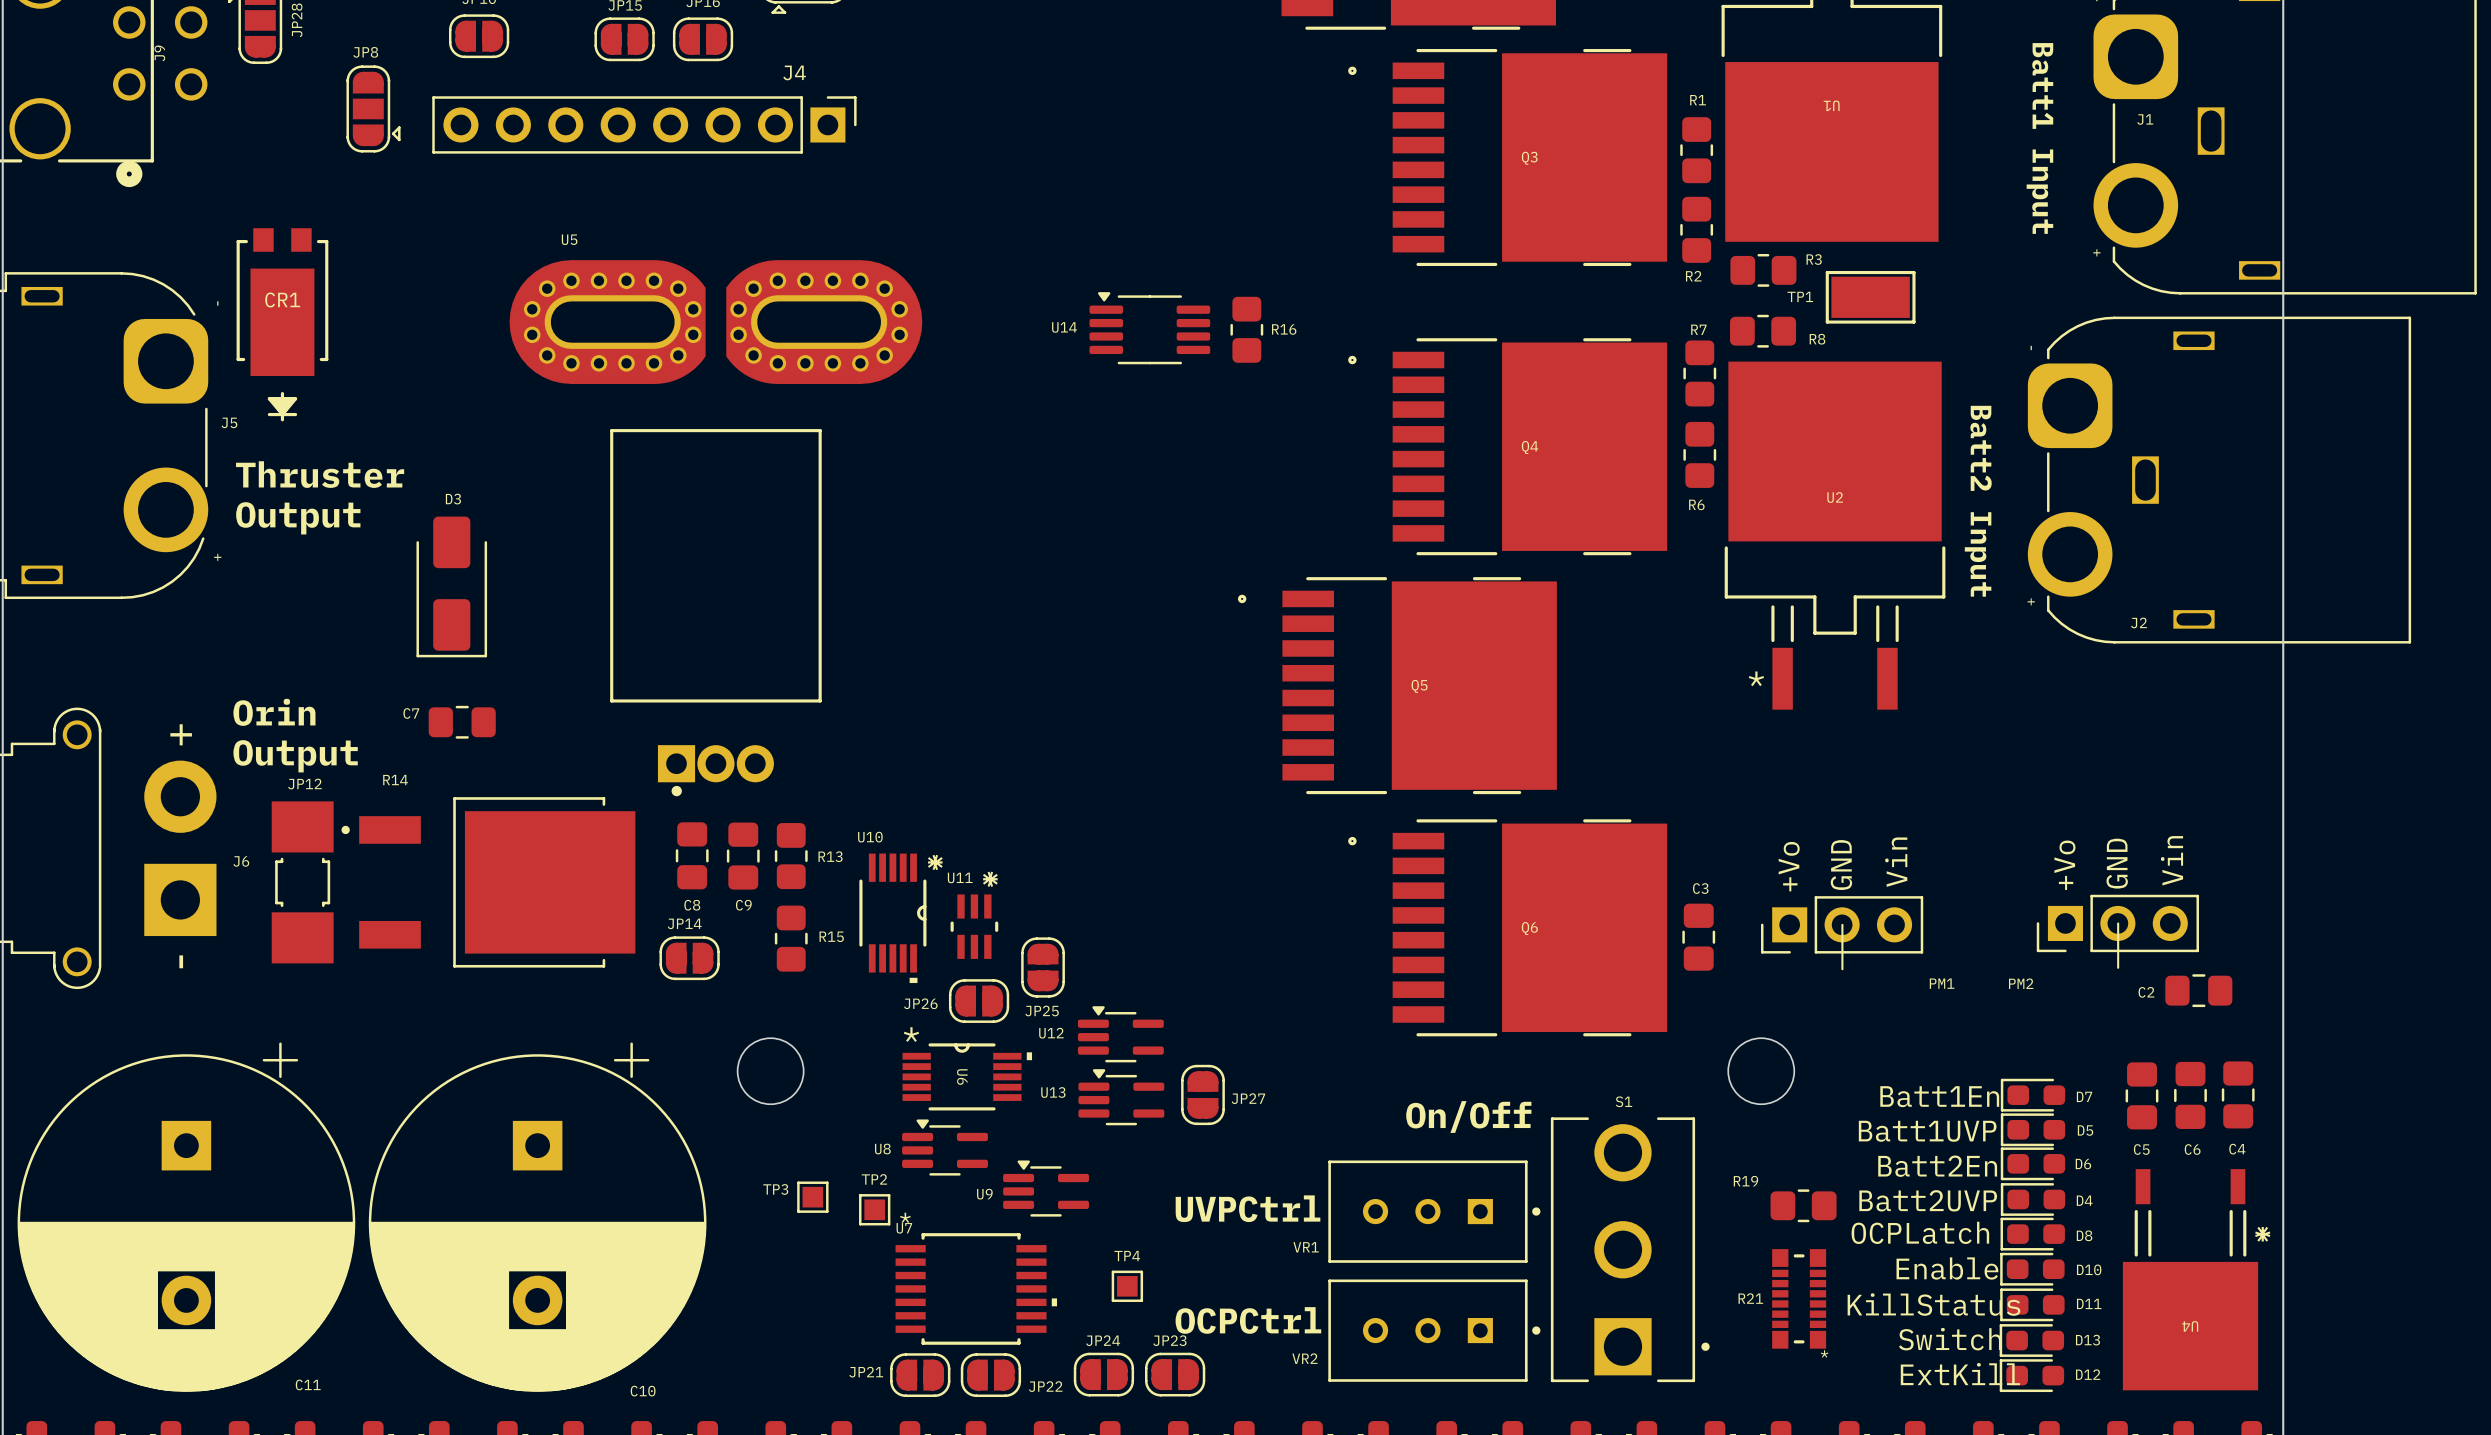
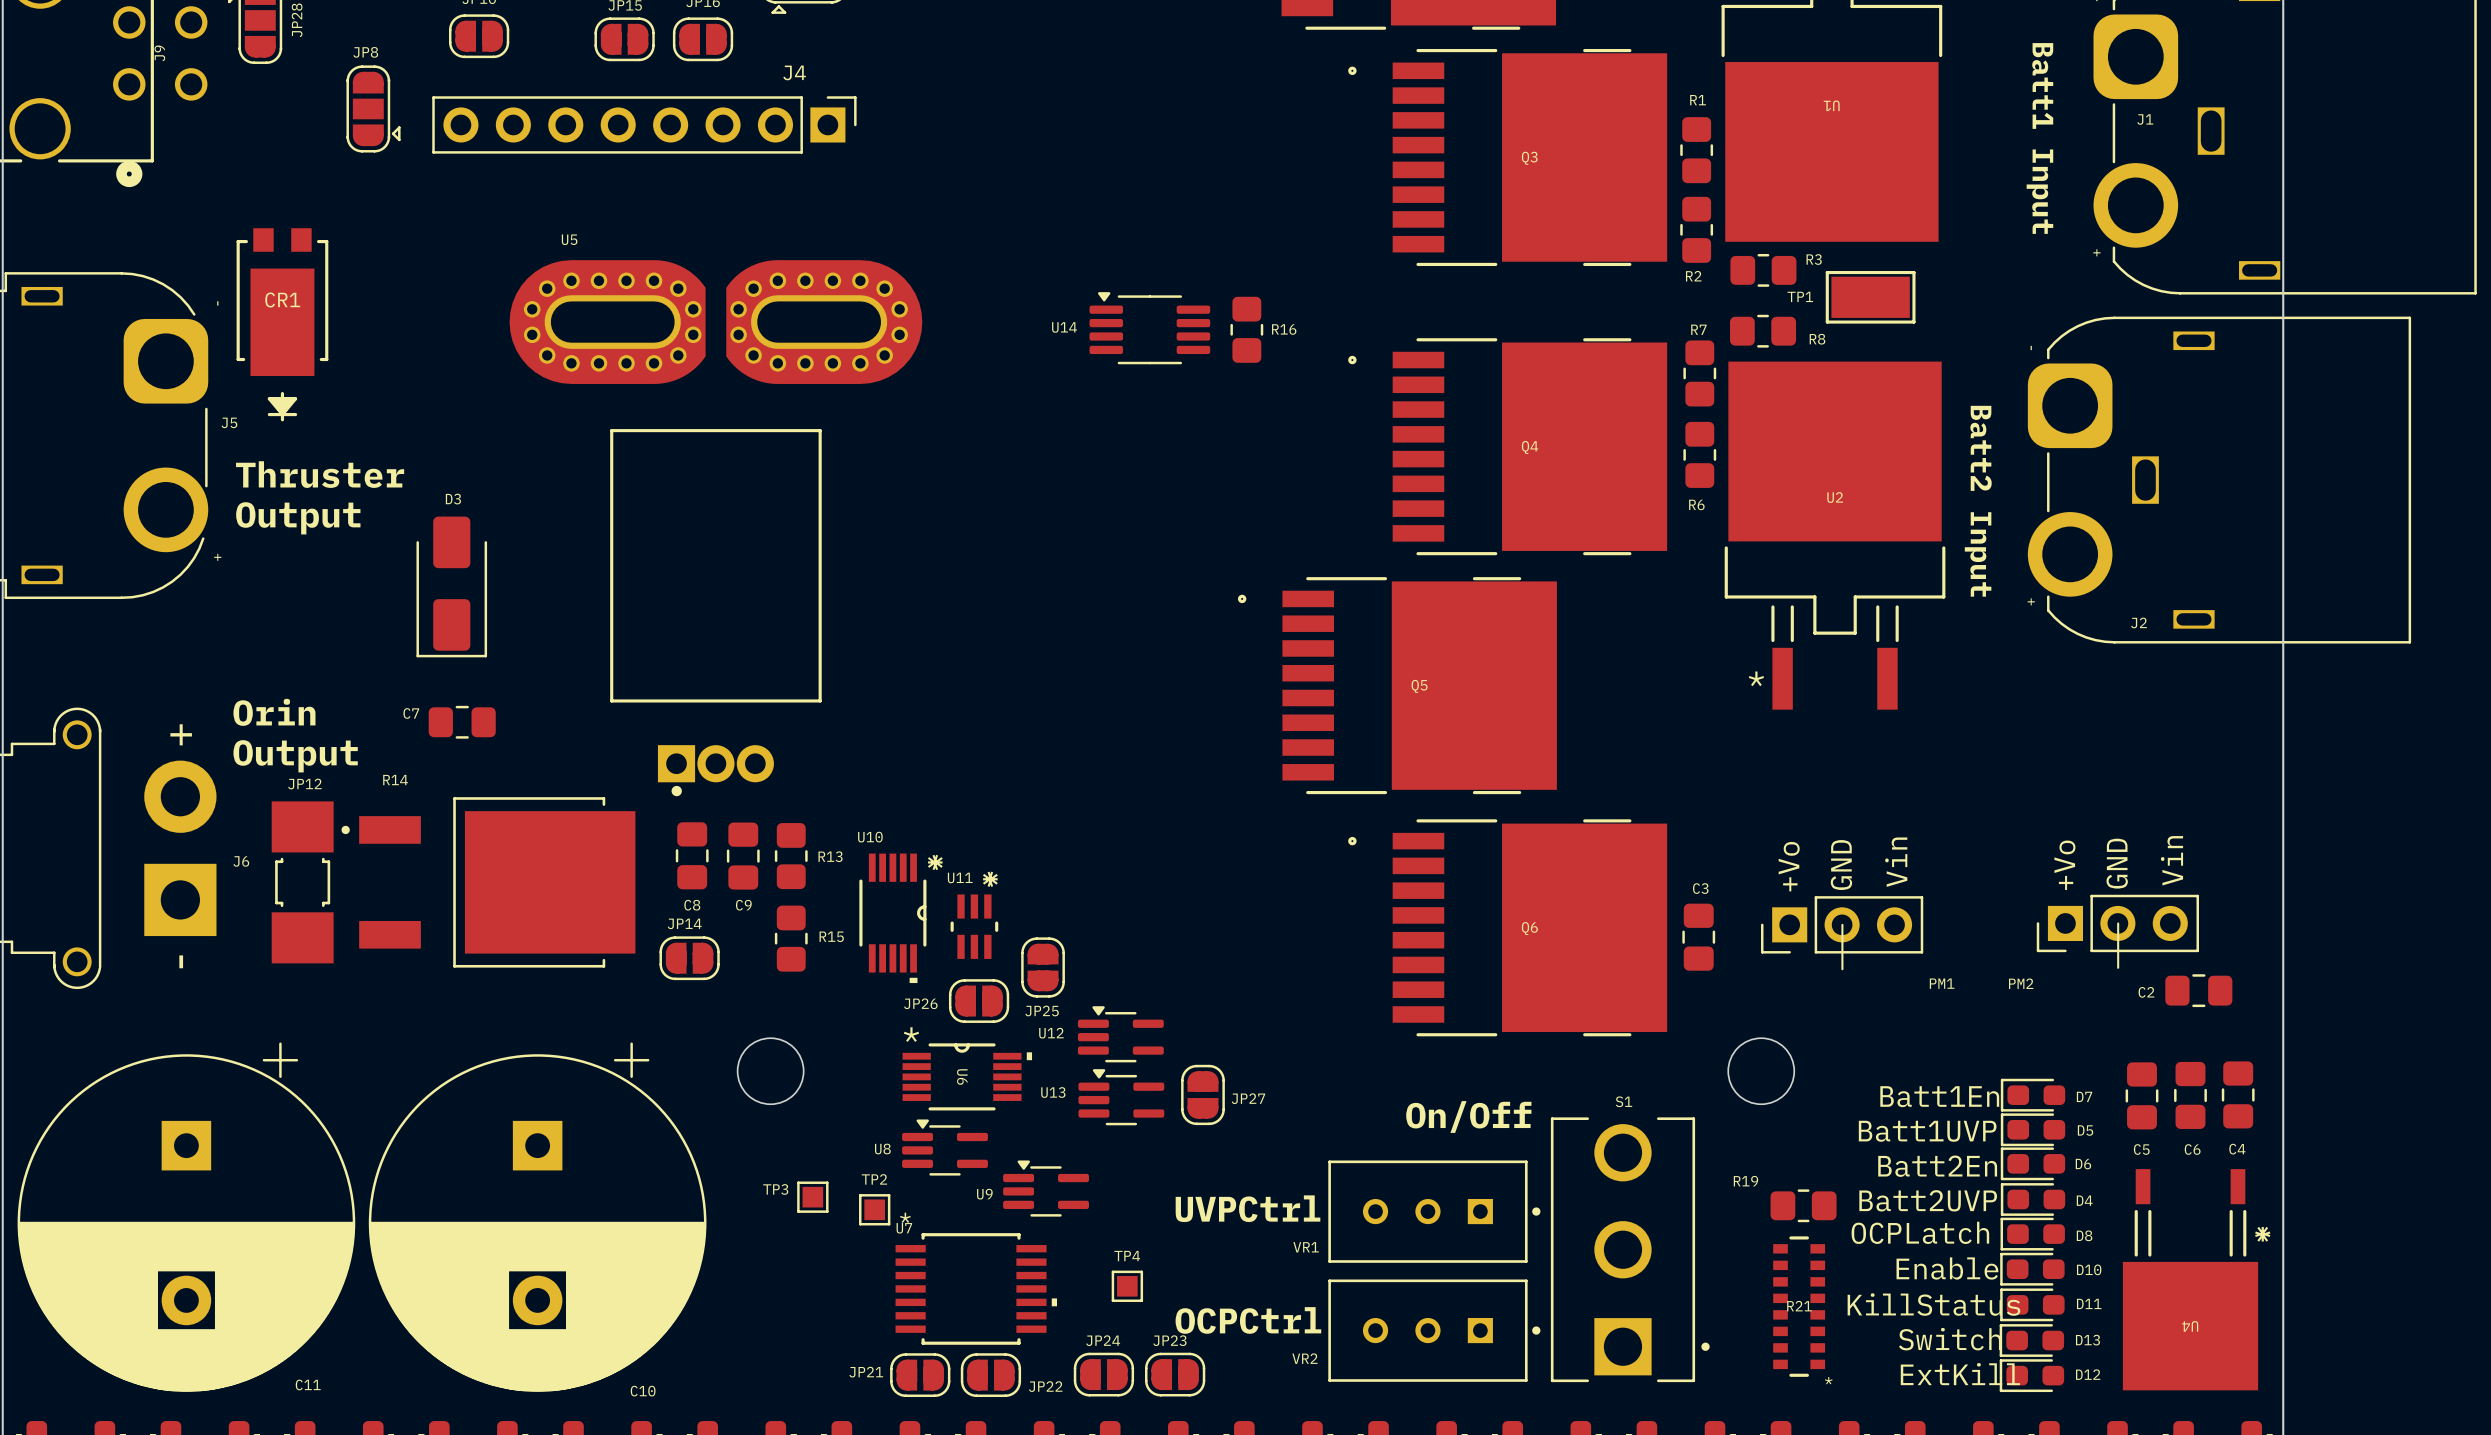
R21 footprint: [1772, 1249, 1827, 1349] -> [1773, 1236, 1826, 1377]
R21 name position: R21 (1750, 1298) -> R21 (1799, 1306)

